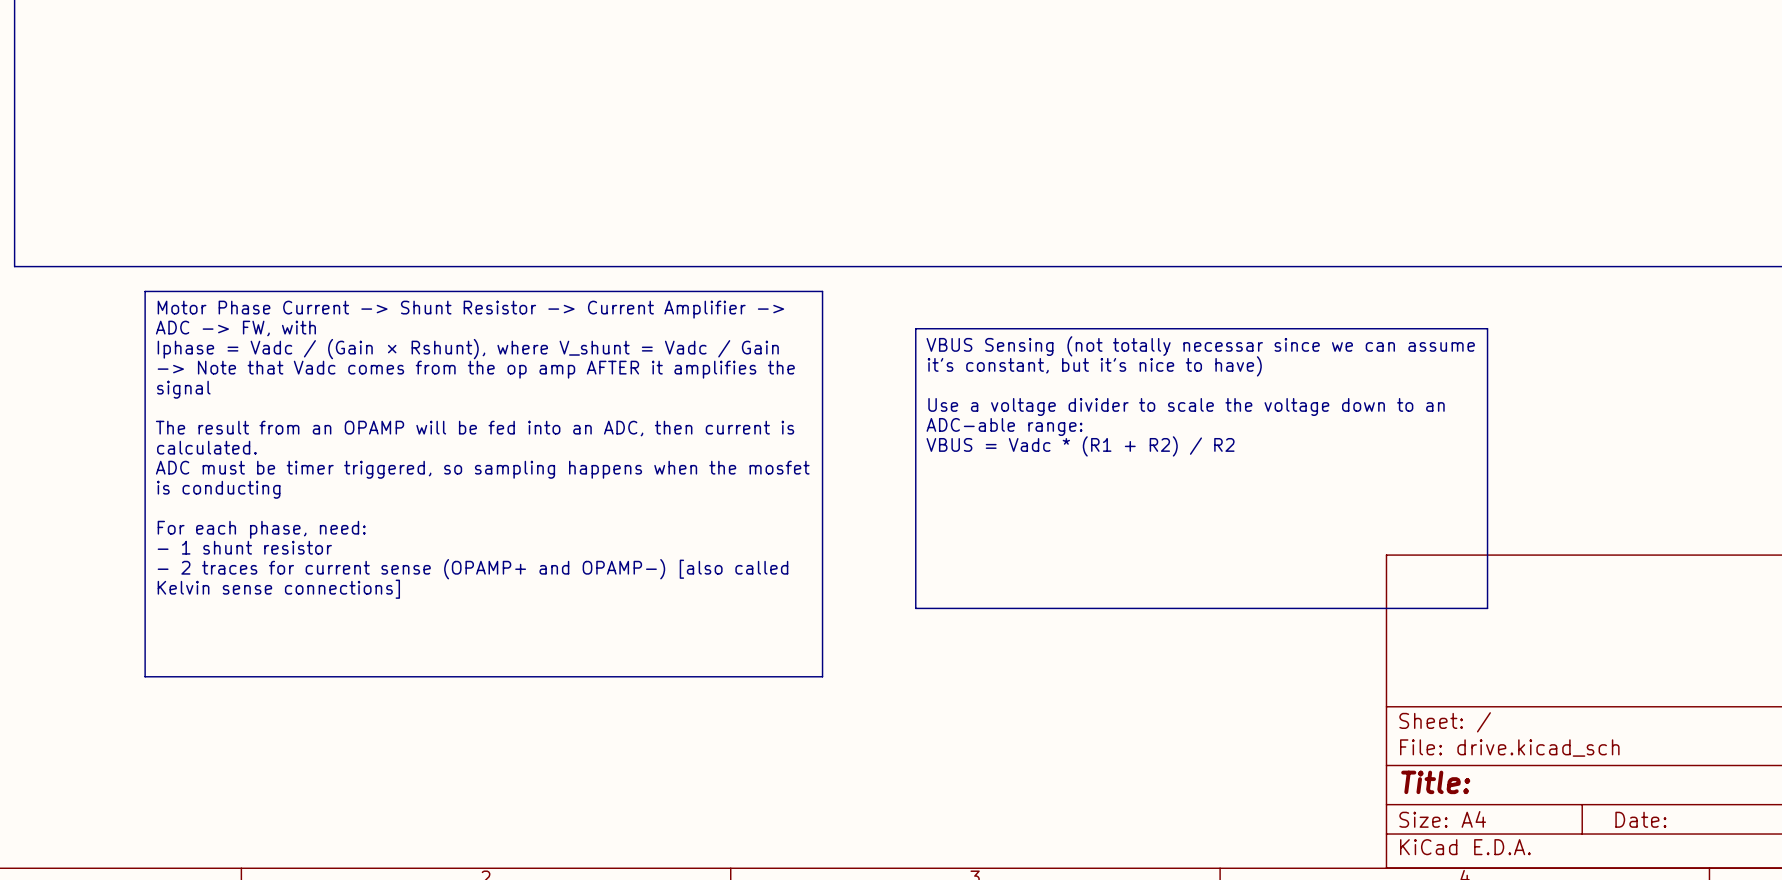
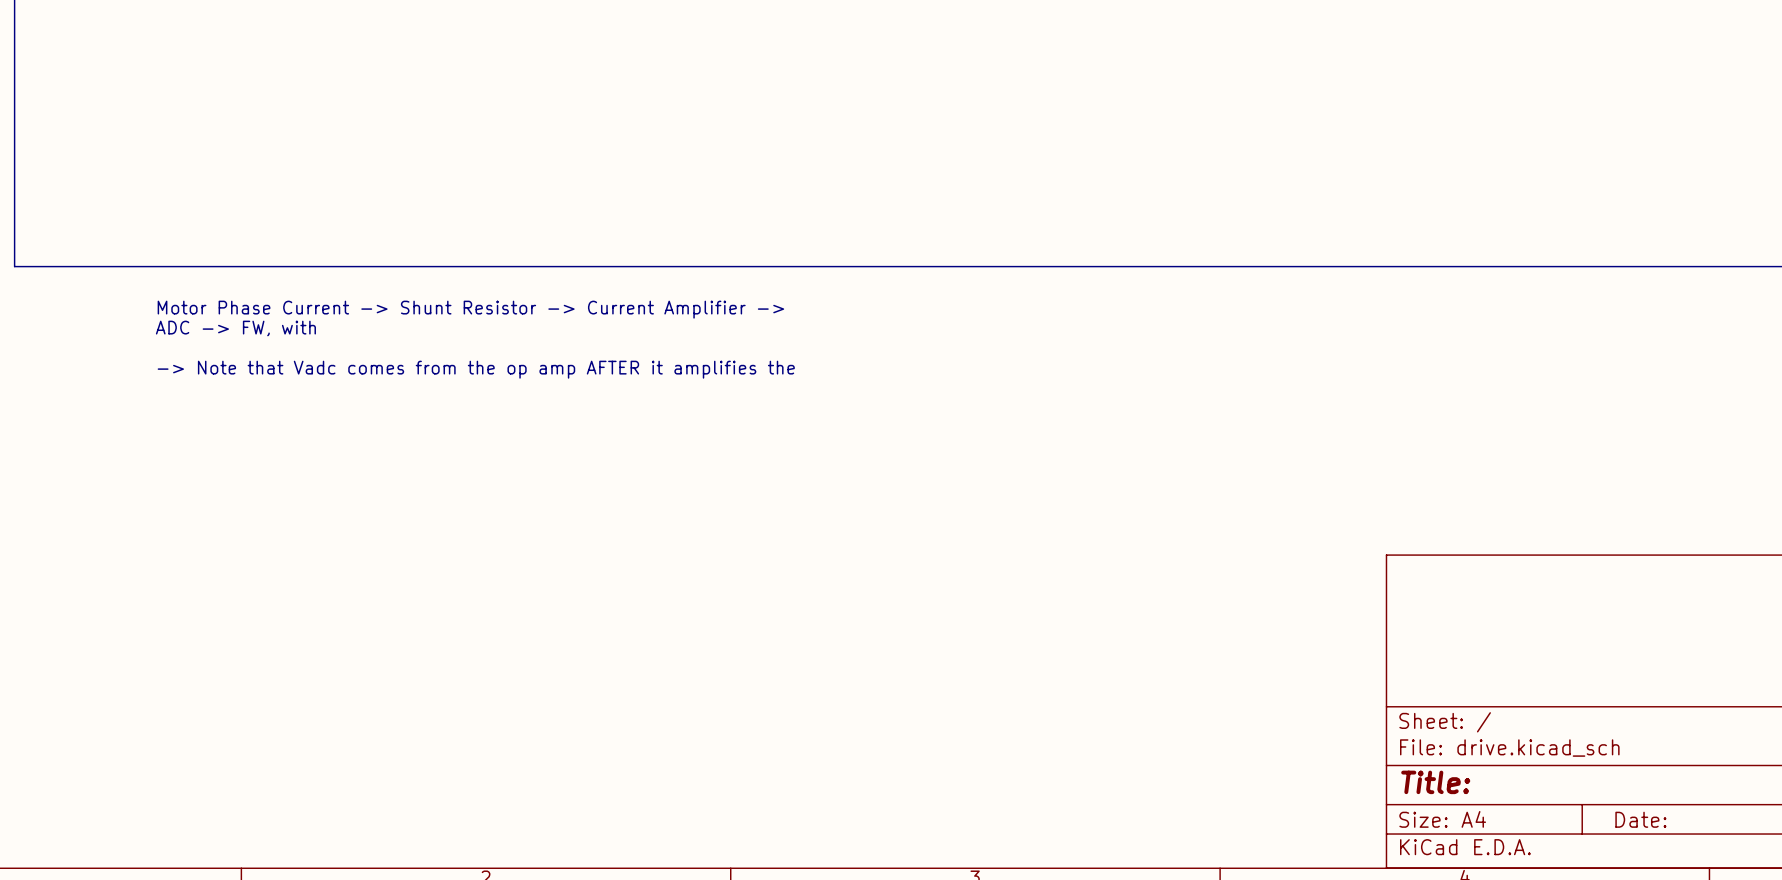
line: (145, 291) (822, 291) (822, 676) (145, 676) (145, 291) -> none
line: (915, 328) (1487, 328) (1487, 608) (915, 608) (915, 328) -> none
text: VBUS Sensing (not totally necessar since we can assume (1200, 346) -> none
text: Iphase = Vadc / (Gain × Rshunt), where V_shunt = Vadc / Gain (468, 349) -> none
text: it's constant, but it's nice to have) (1094, 366) -> none
text: signal (183, 389) -> none
text: Use a voltage divider to scale the voltage down to an (1186, 406) -> none
text: ADC-able range: (1004, 426) -> none
text: The result from an OPAMP will be fed into an ADC, then current is (475, 428) -> none
text: VBUS = Vadc * (R1 + R2) / R2 (1080, 446) -> none
text: calculated. (206, 447) -> none
text: ADC must be timer triggered, so sampling happens when the mosfet (482, 469) -> none
text: is conducting (218, 489) -> none
text: For each phase, need: (261, 529) -> none
text: - 1 shunt resistor (244, 547) -> none
text: - 2 traces for current sense (OPAMP+ and OPAMP-) [also called (472, 569) -> none
text: Kelvin sense connections] (278, 589) -> none

